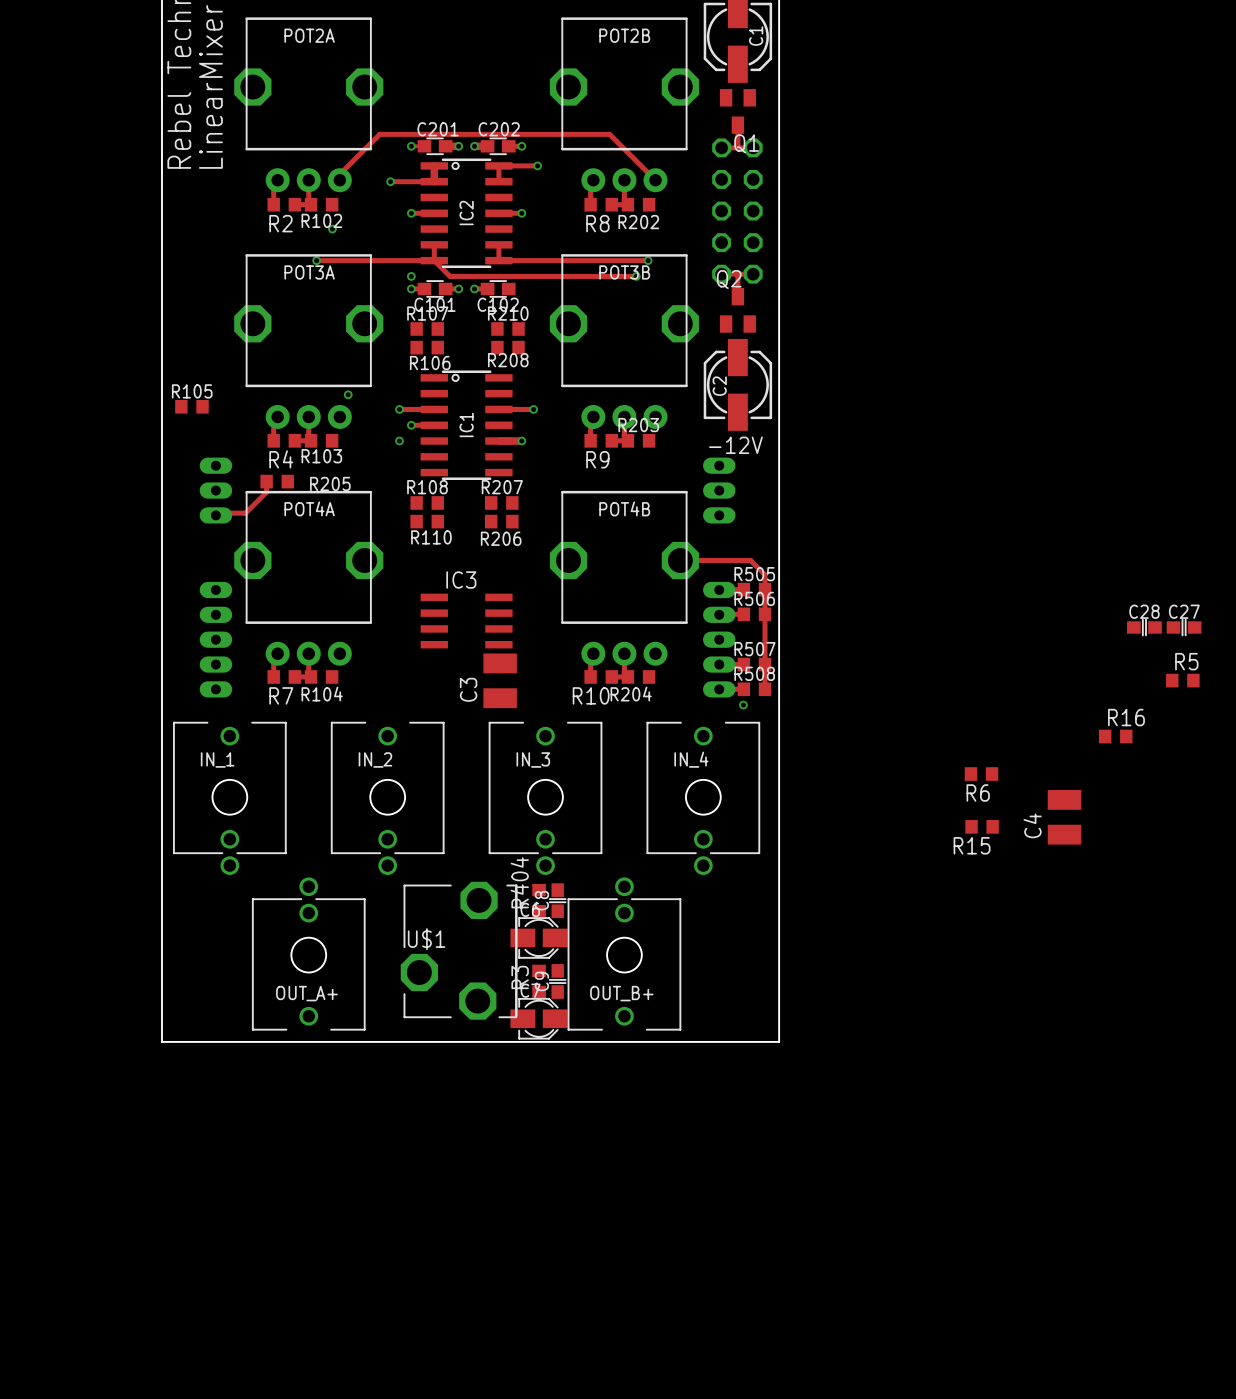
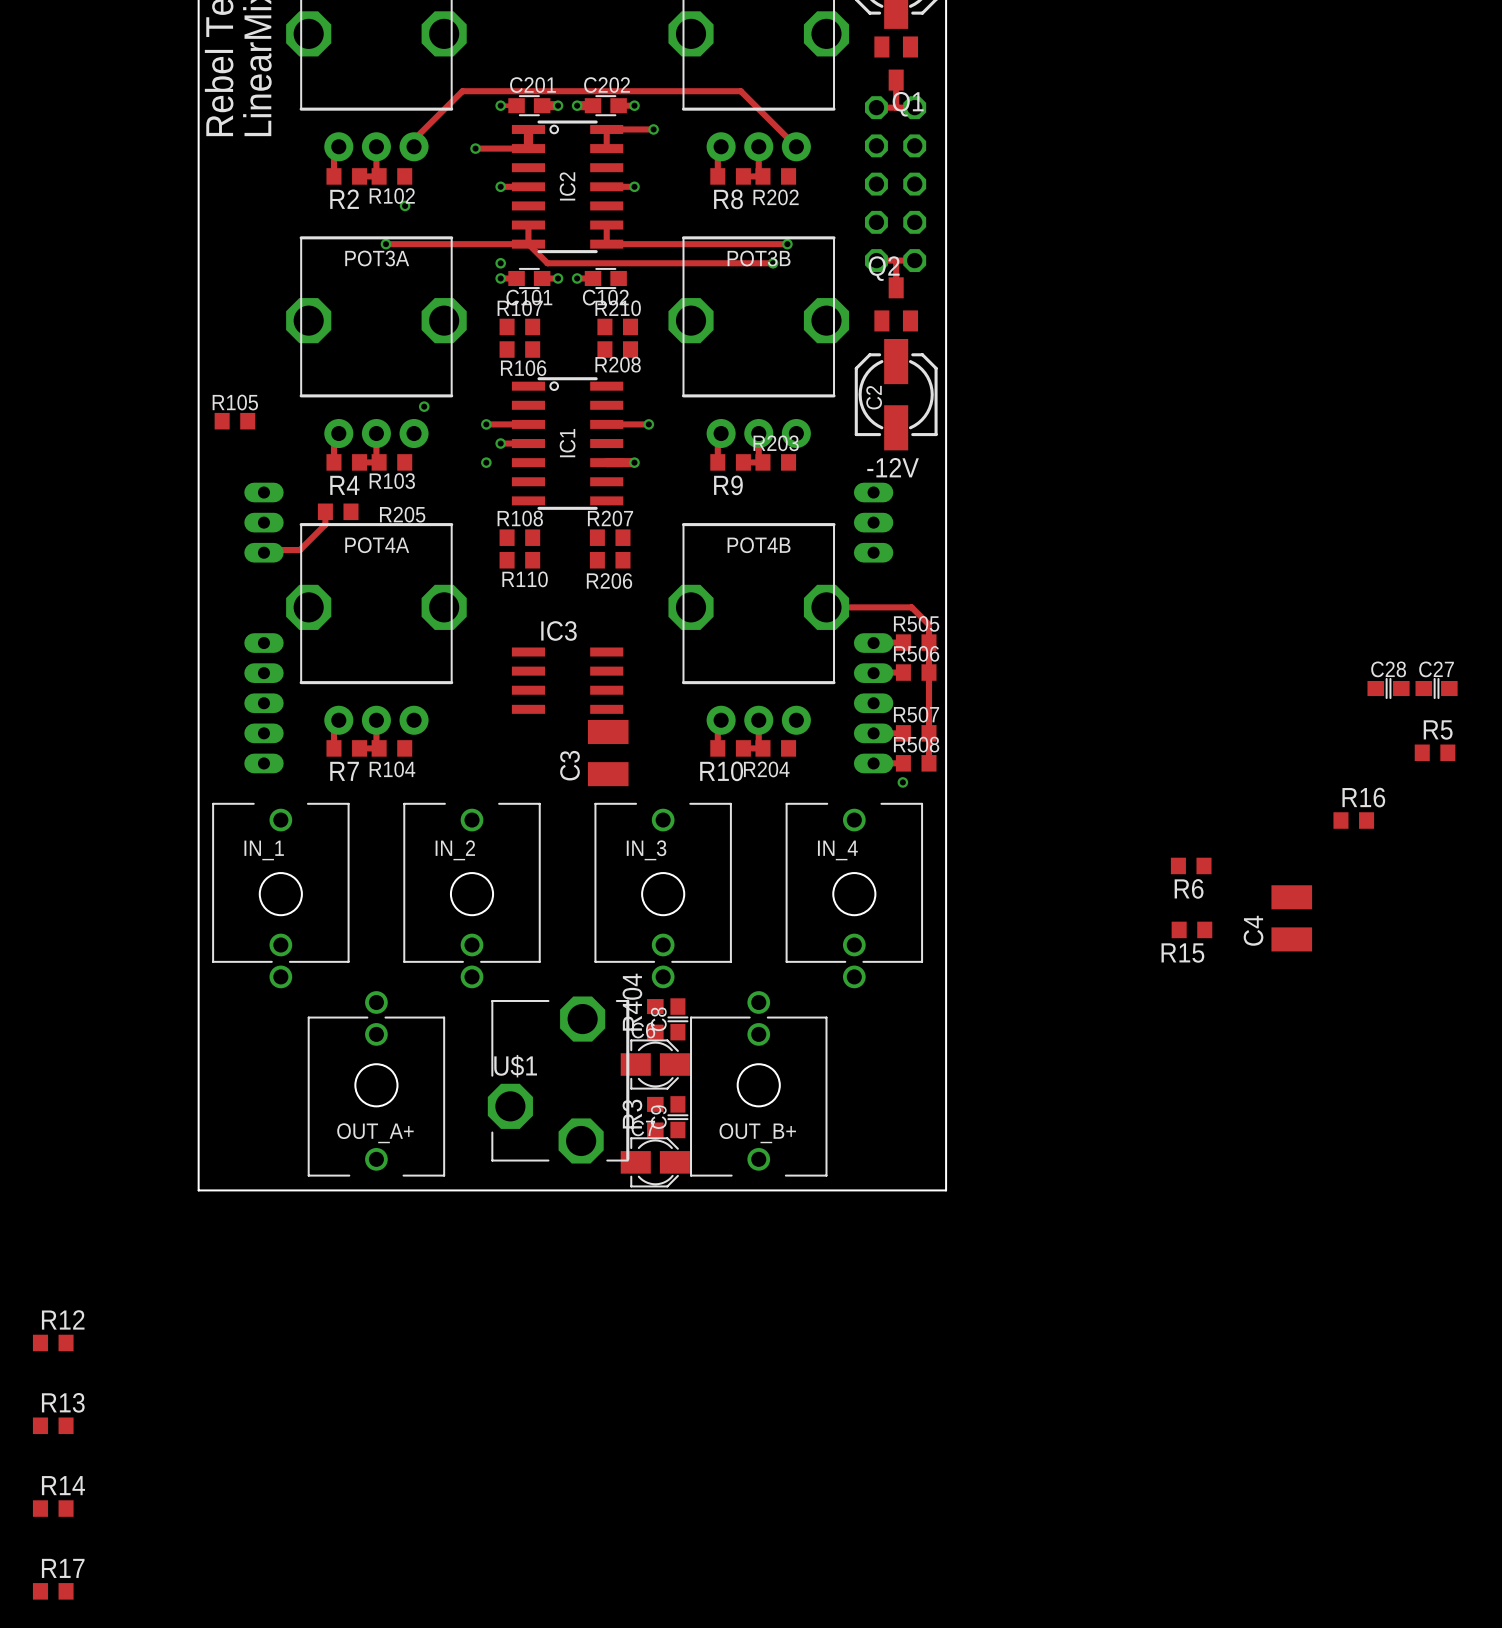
R12: none -> (53, 1342)
R13: none -> (53, 1425)
R14: none -> (53, 1508)
R17: none -> (53, 1591)

